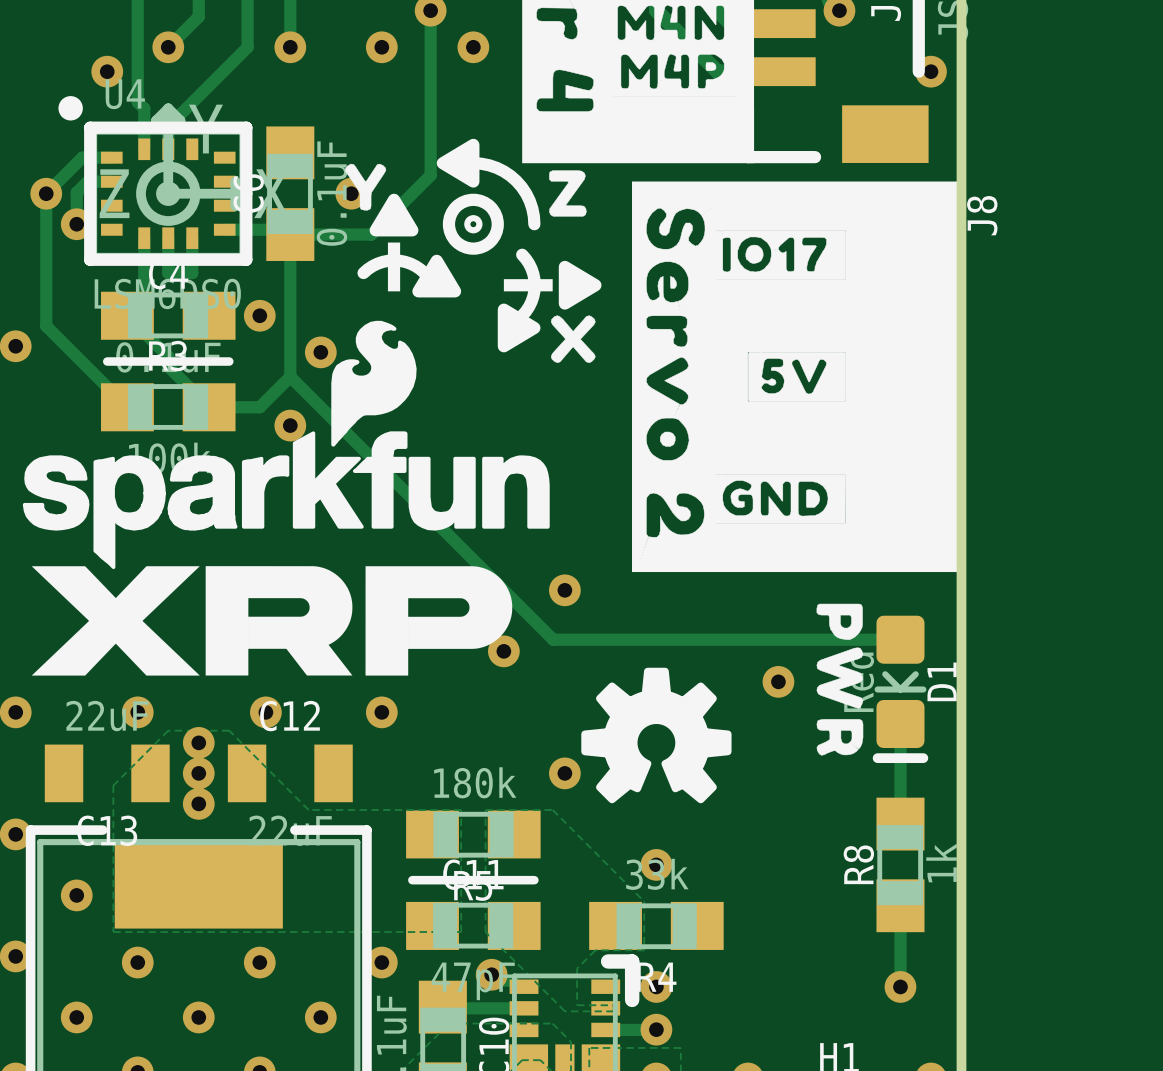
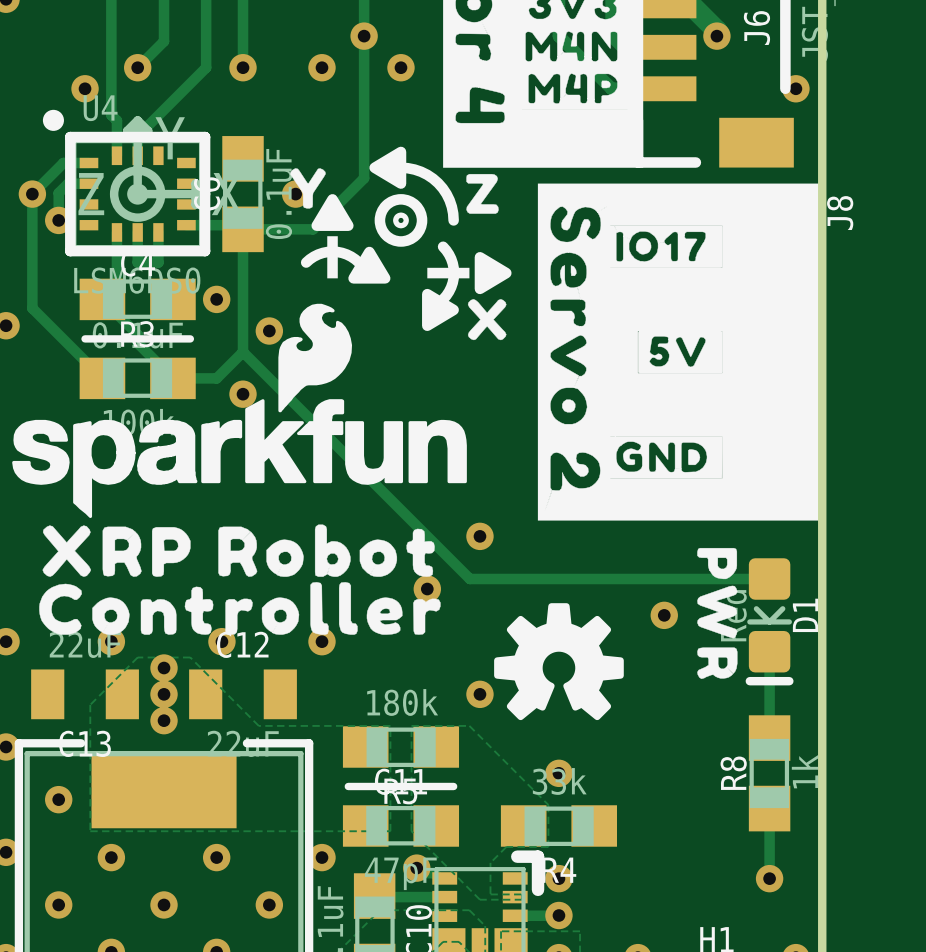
drawing shape: [31, 566, 513, 676] -> [42, 524, 435, 577]
drawing: none -> [39, 582, 441, 635]

